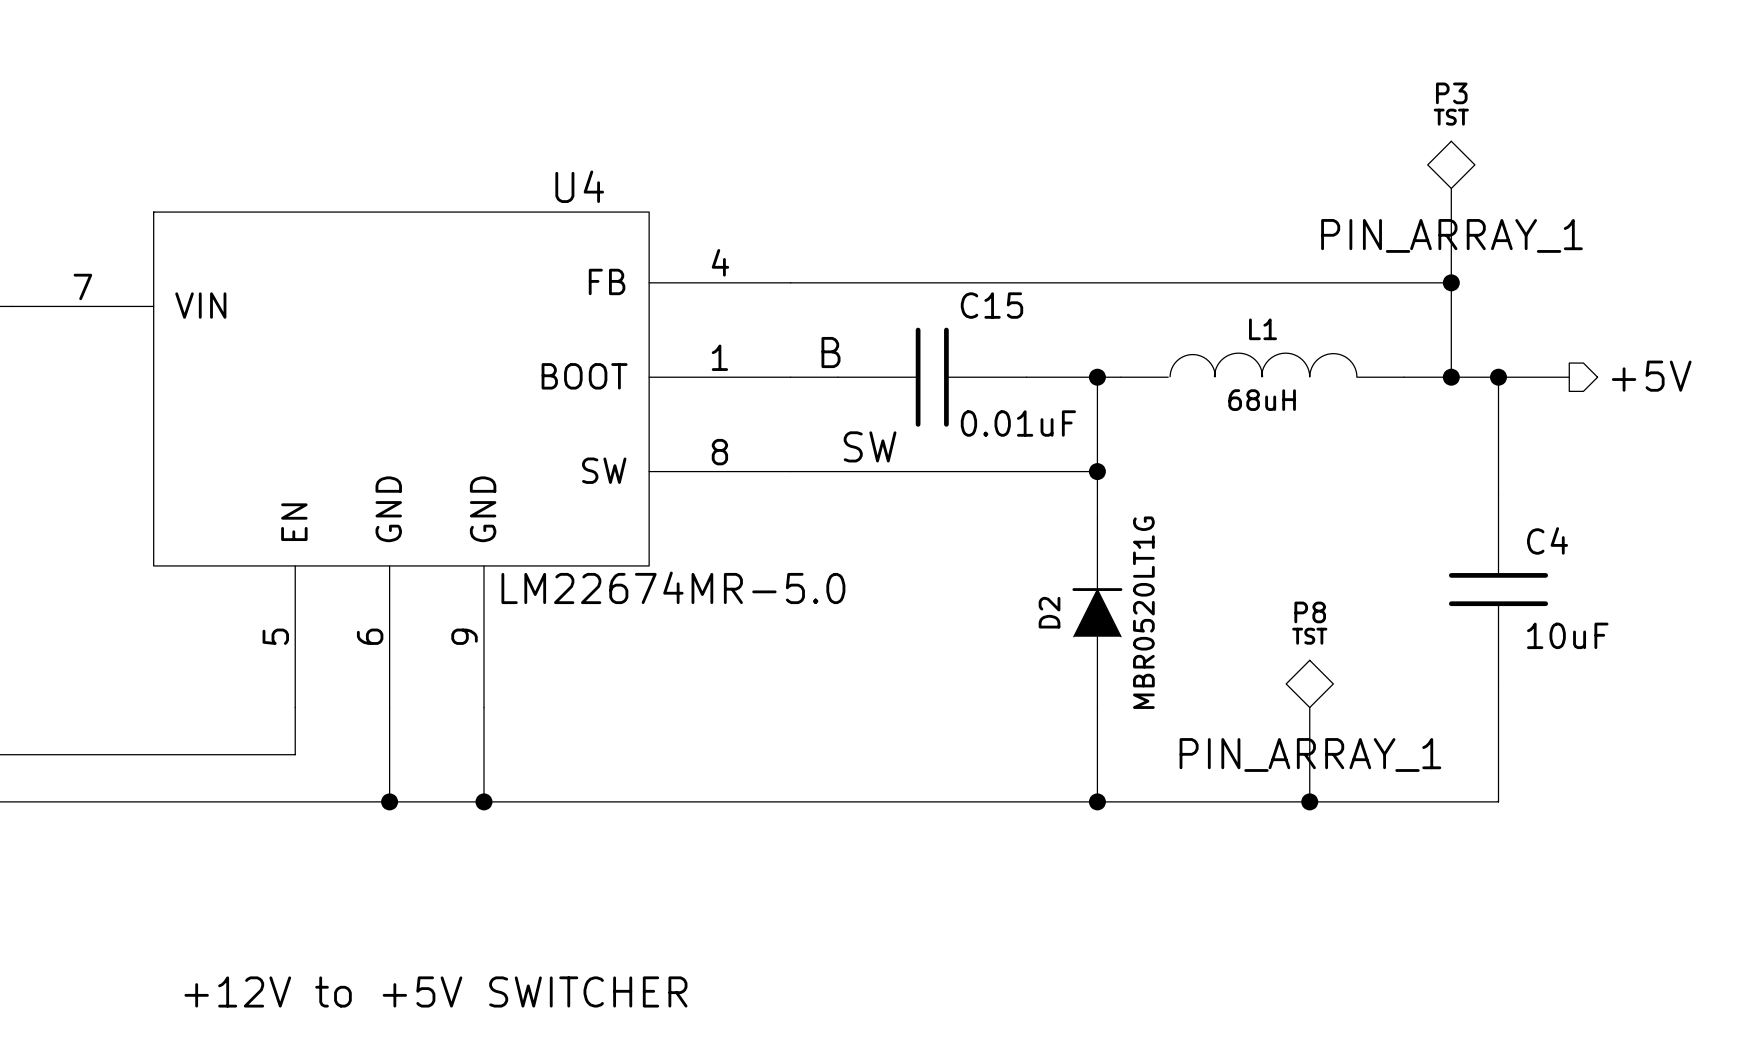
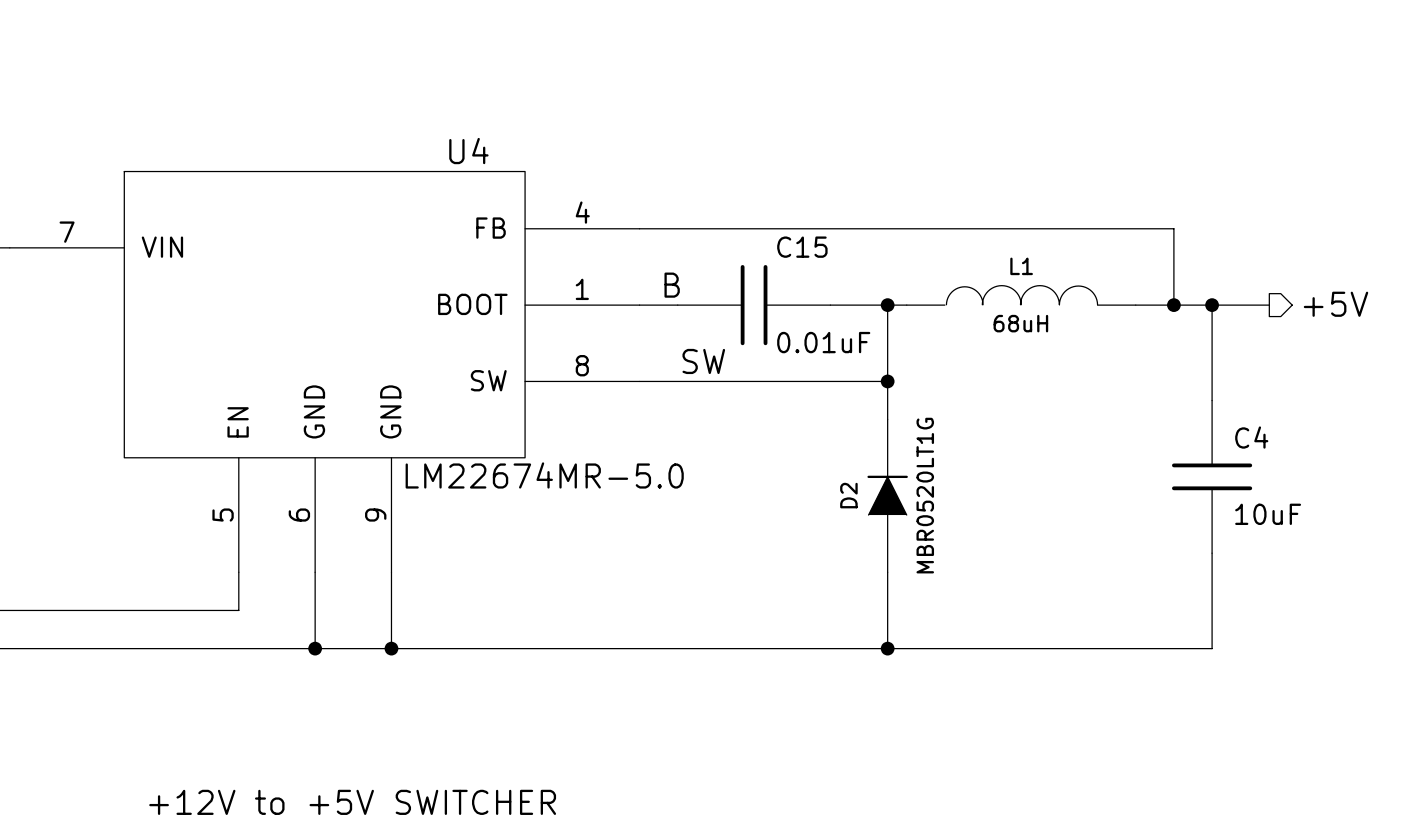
P3: TST (1451, 188) -> none
wire: (1451, 235) (1451, 282) -> none
junction: (1451, 282) -> none
P8: TST (1309, 707) -> none
wire: (1309, 754) (1309, 801) -> none
junction: (1309, 801) -> none

